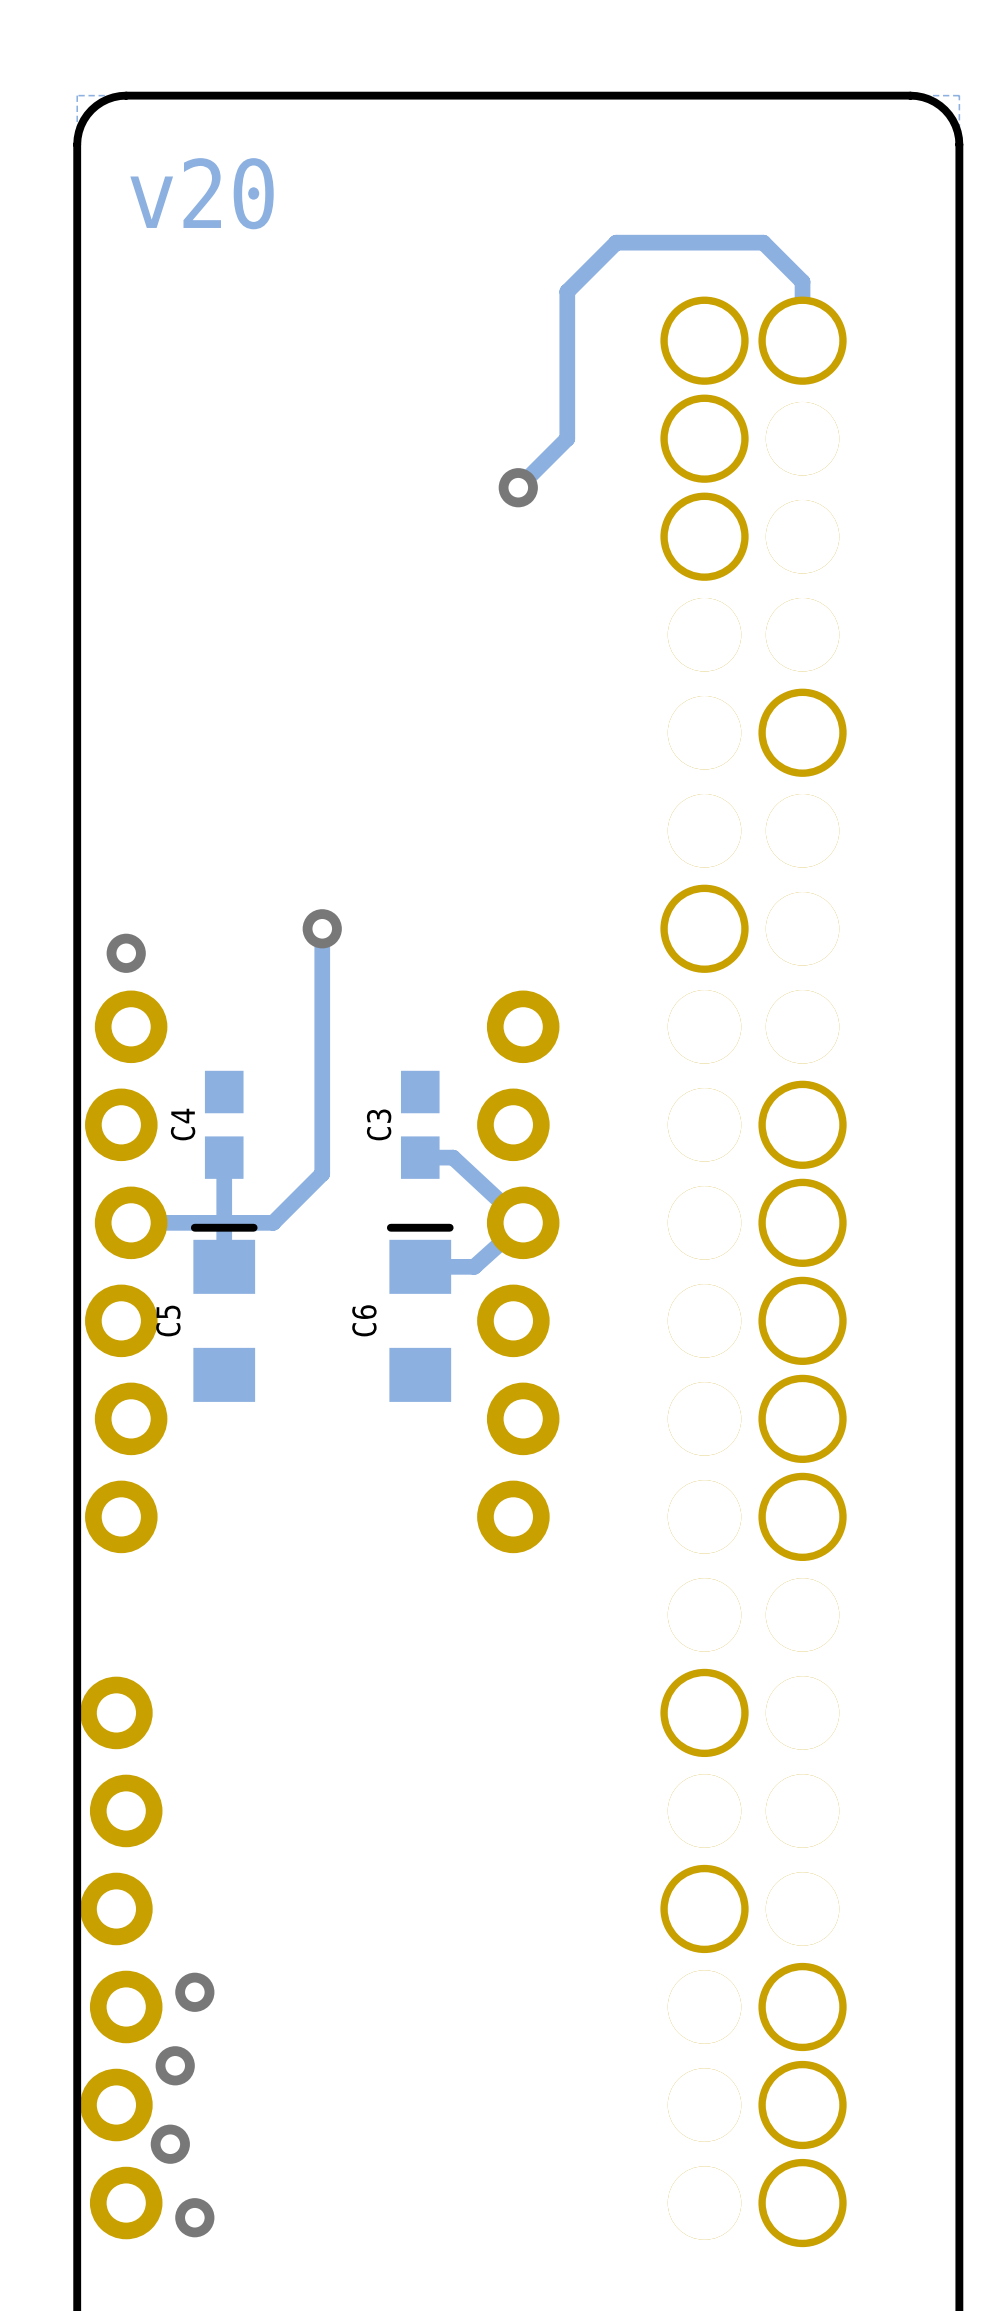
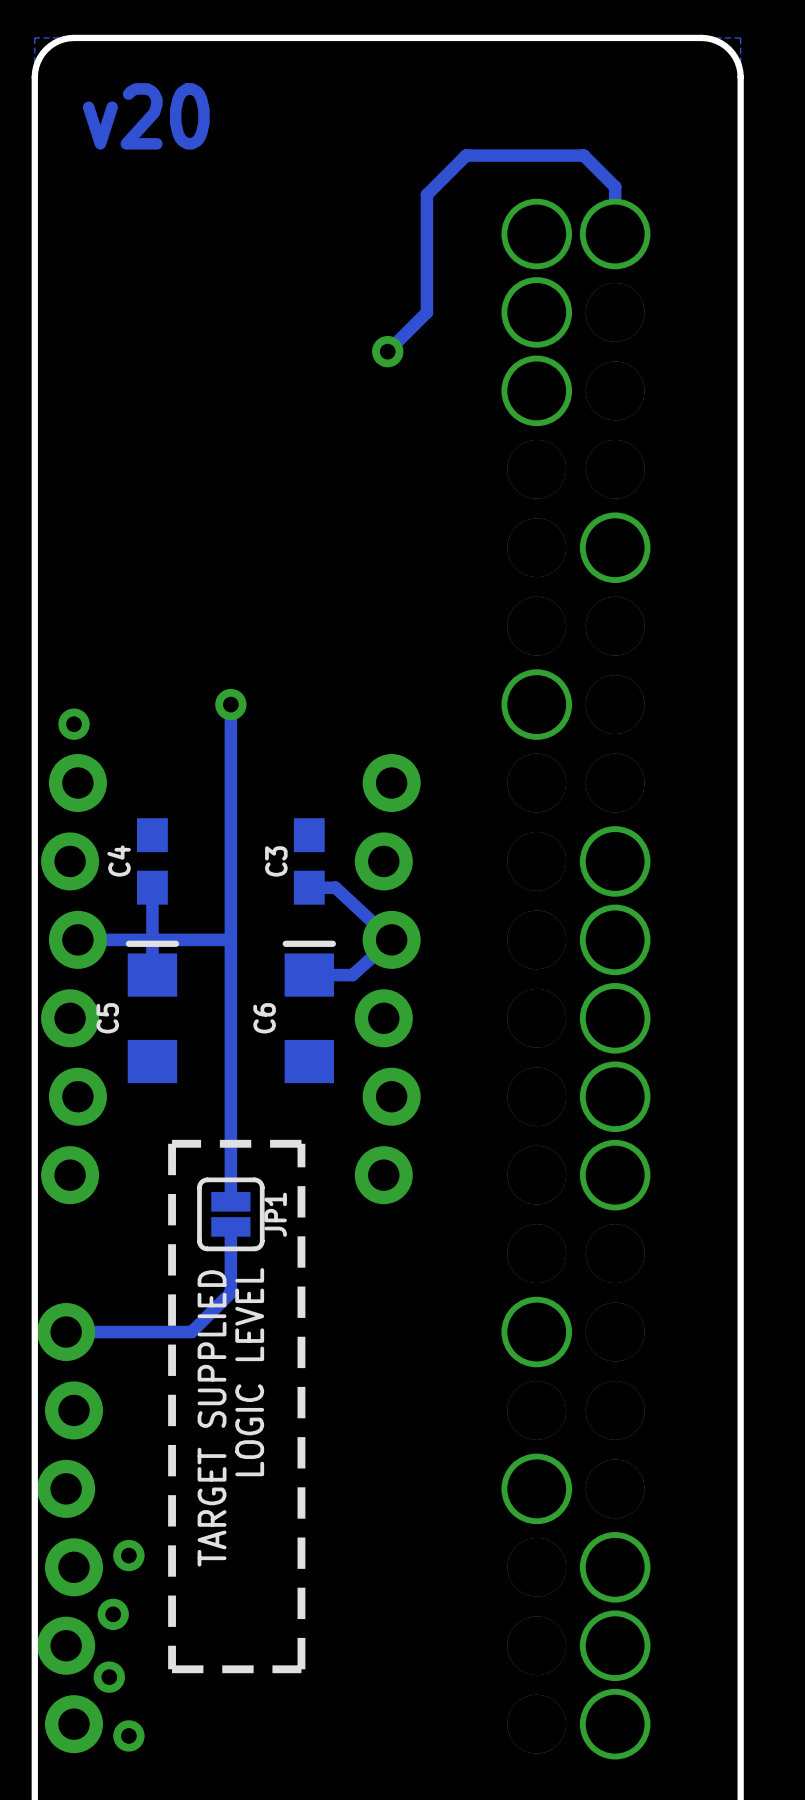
track: (322, 1173) (273, 1222) -> (230, 939) (191, 939)
track: none -> (230, 900) (230, 1201)
line: none -> (301, 1143) (301, 1669) (172, 1669) (172, 1143) (301, 1143)
JP1: none -> (230, 1214)
track: none -> (230, 1226) (230, 1292) (191, 1332) (66, 1332)
text: none -> LOGIC LEVEL (249, 1372)
text: none -> TARGET SUPPLIED (212, 1418)

